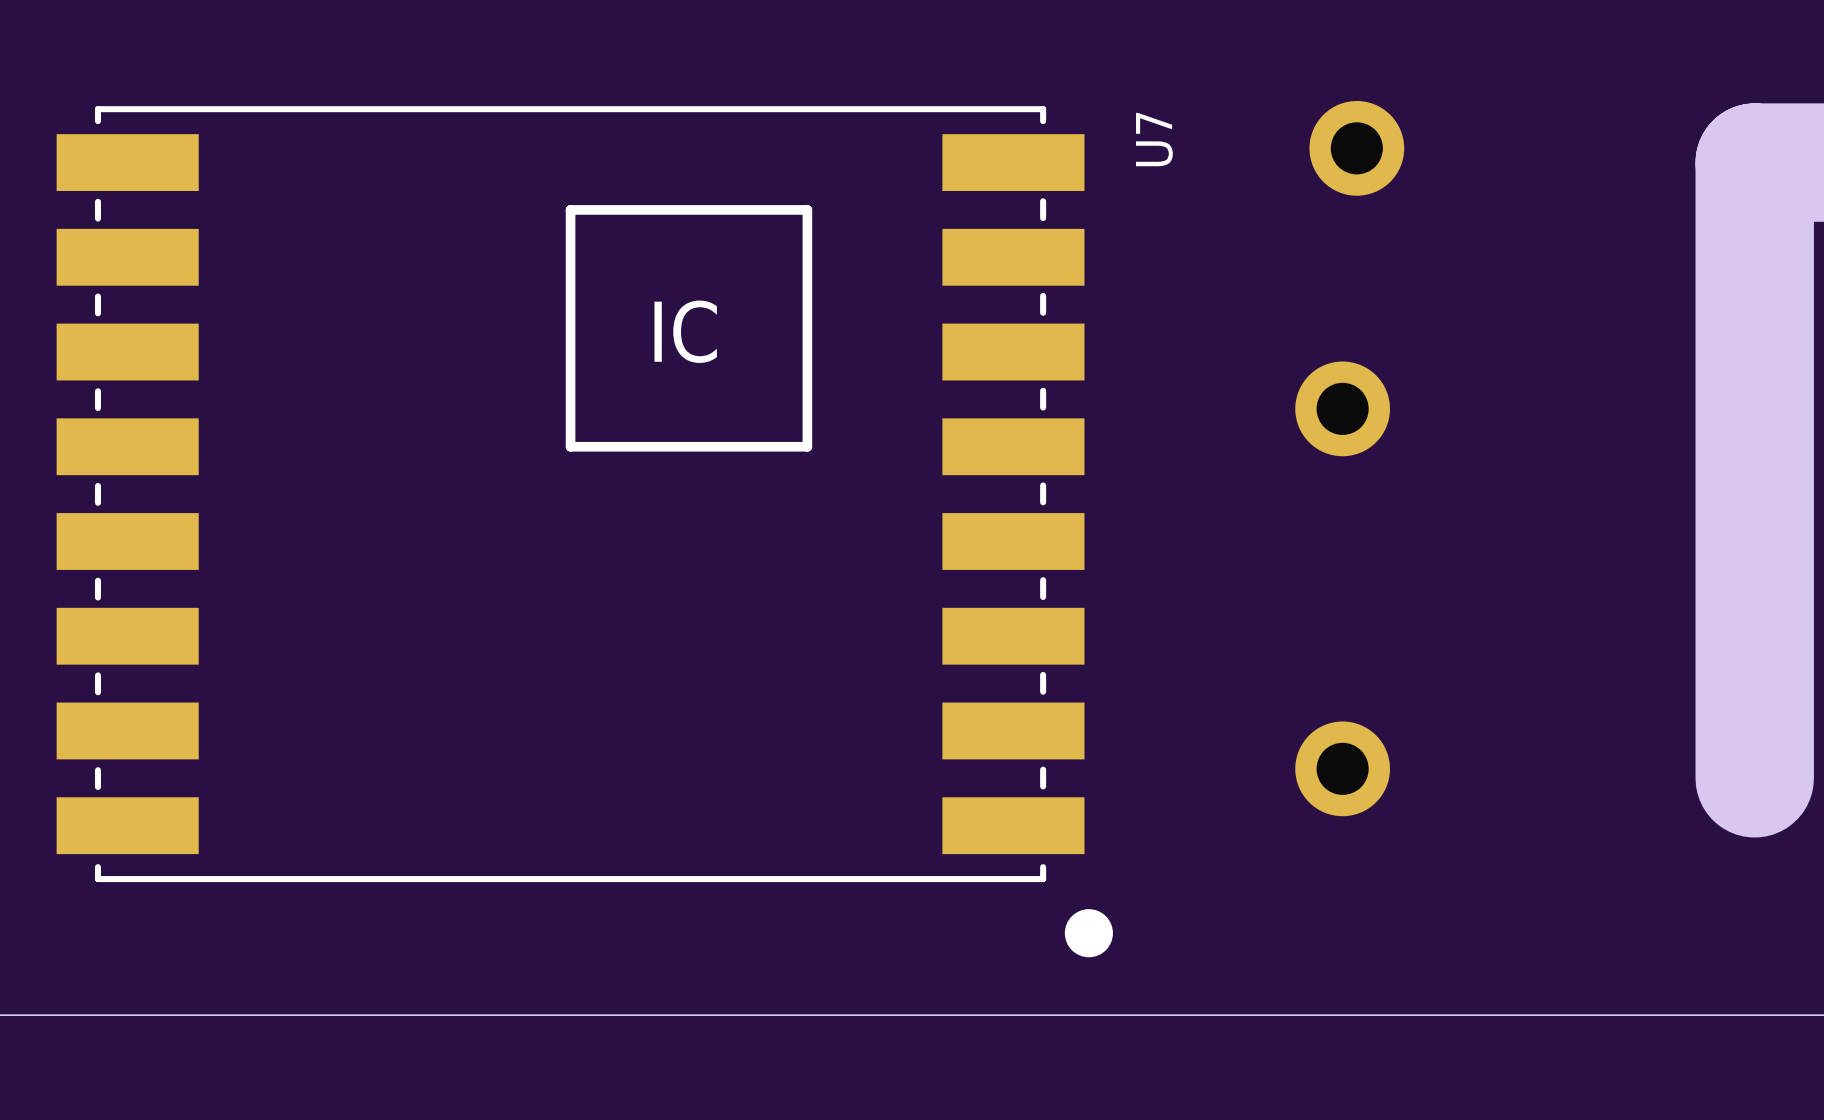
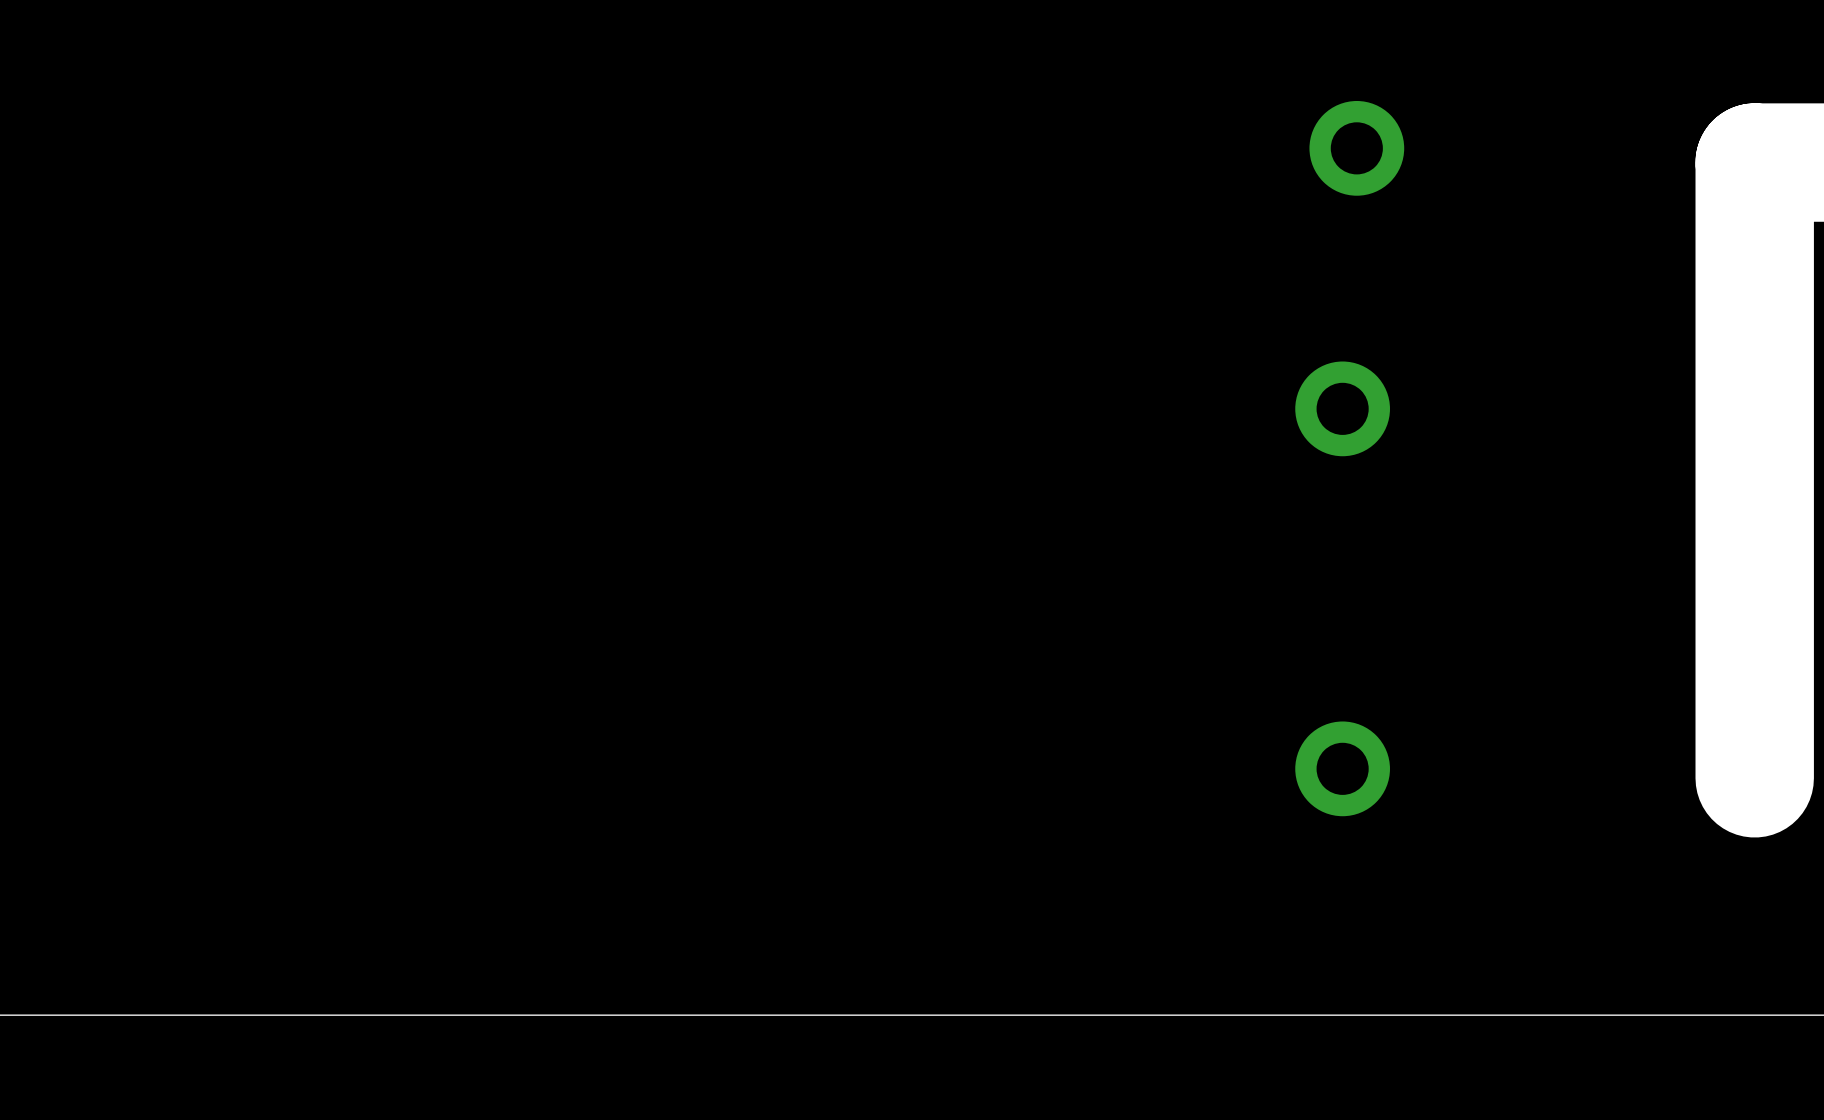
U7: (584, 531) -> none

